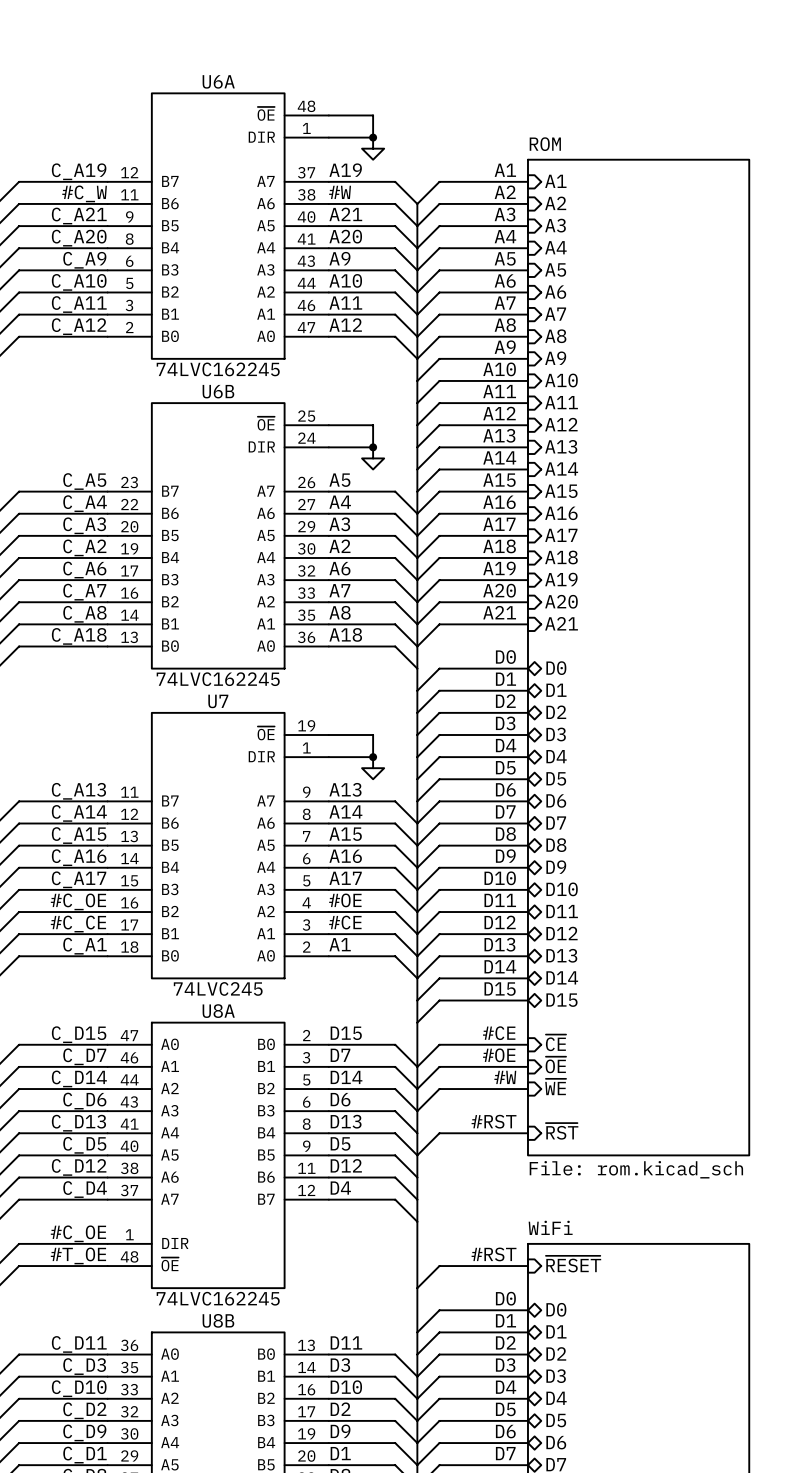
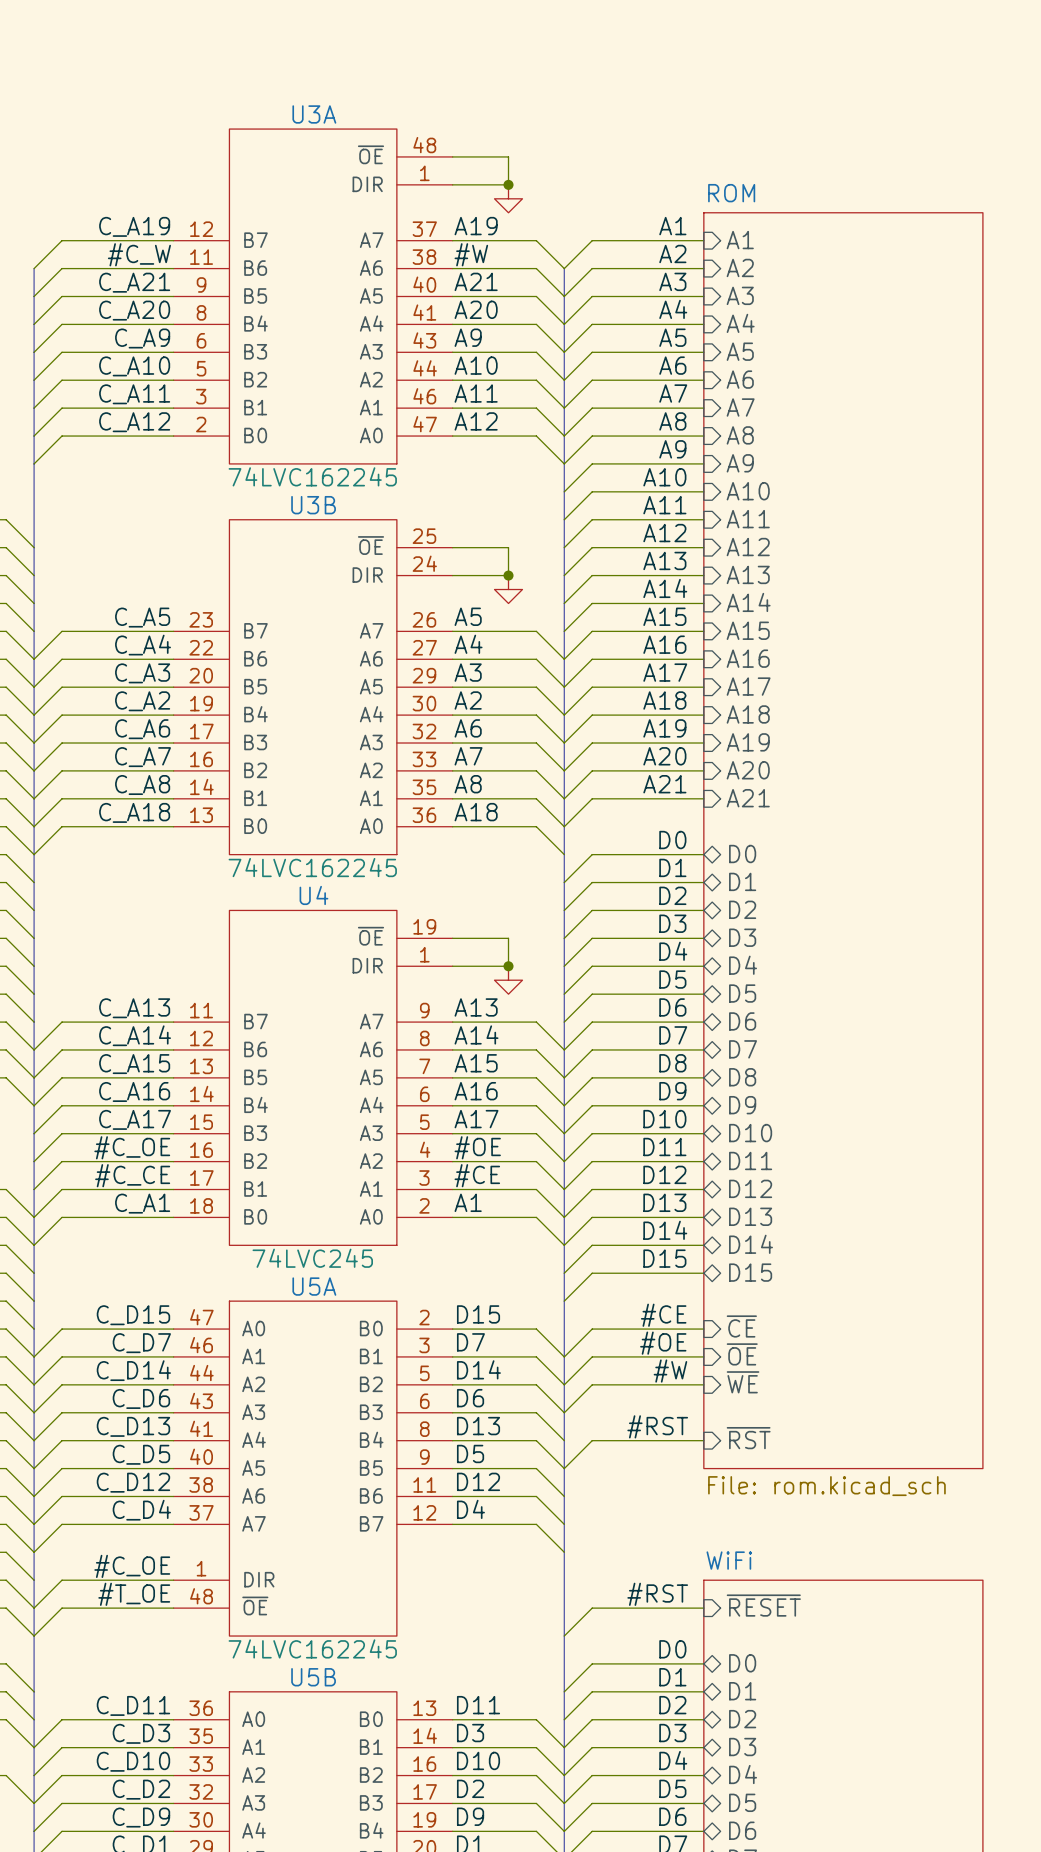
U6A name: U6A (218, 81) -> U3A (314, 114)
U6B name: U6B (218, 391) -> U3B (313, 505)
U7 name: U7 (218, 701) -> U4 (313, 895)
U8A name: U8A (218, 1011) -> U5A (314, 1286)
U8B name: U8B (218, 1320) -> U5B (313, 1677)

